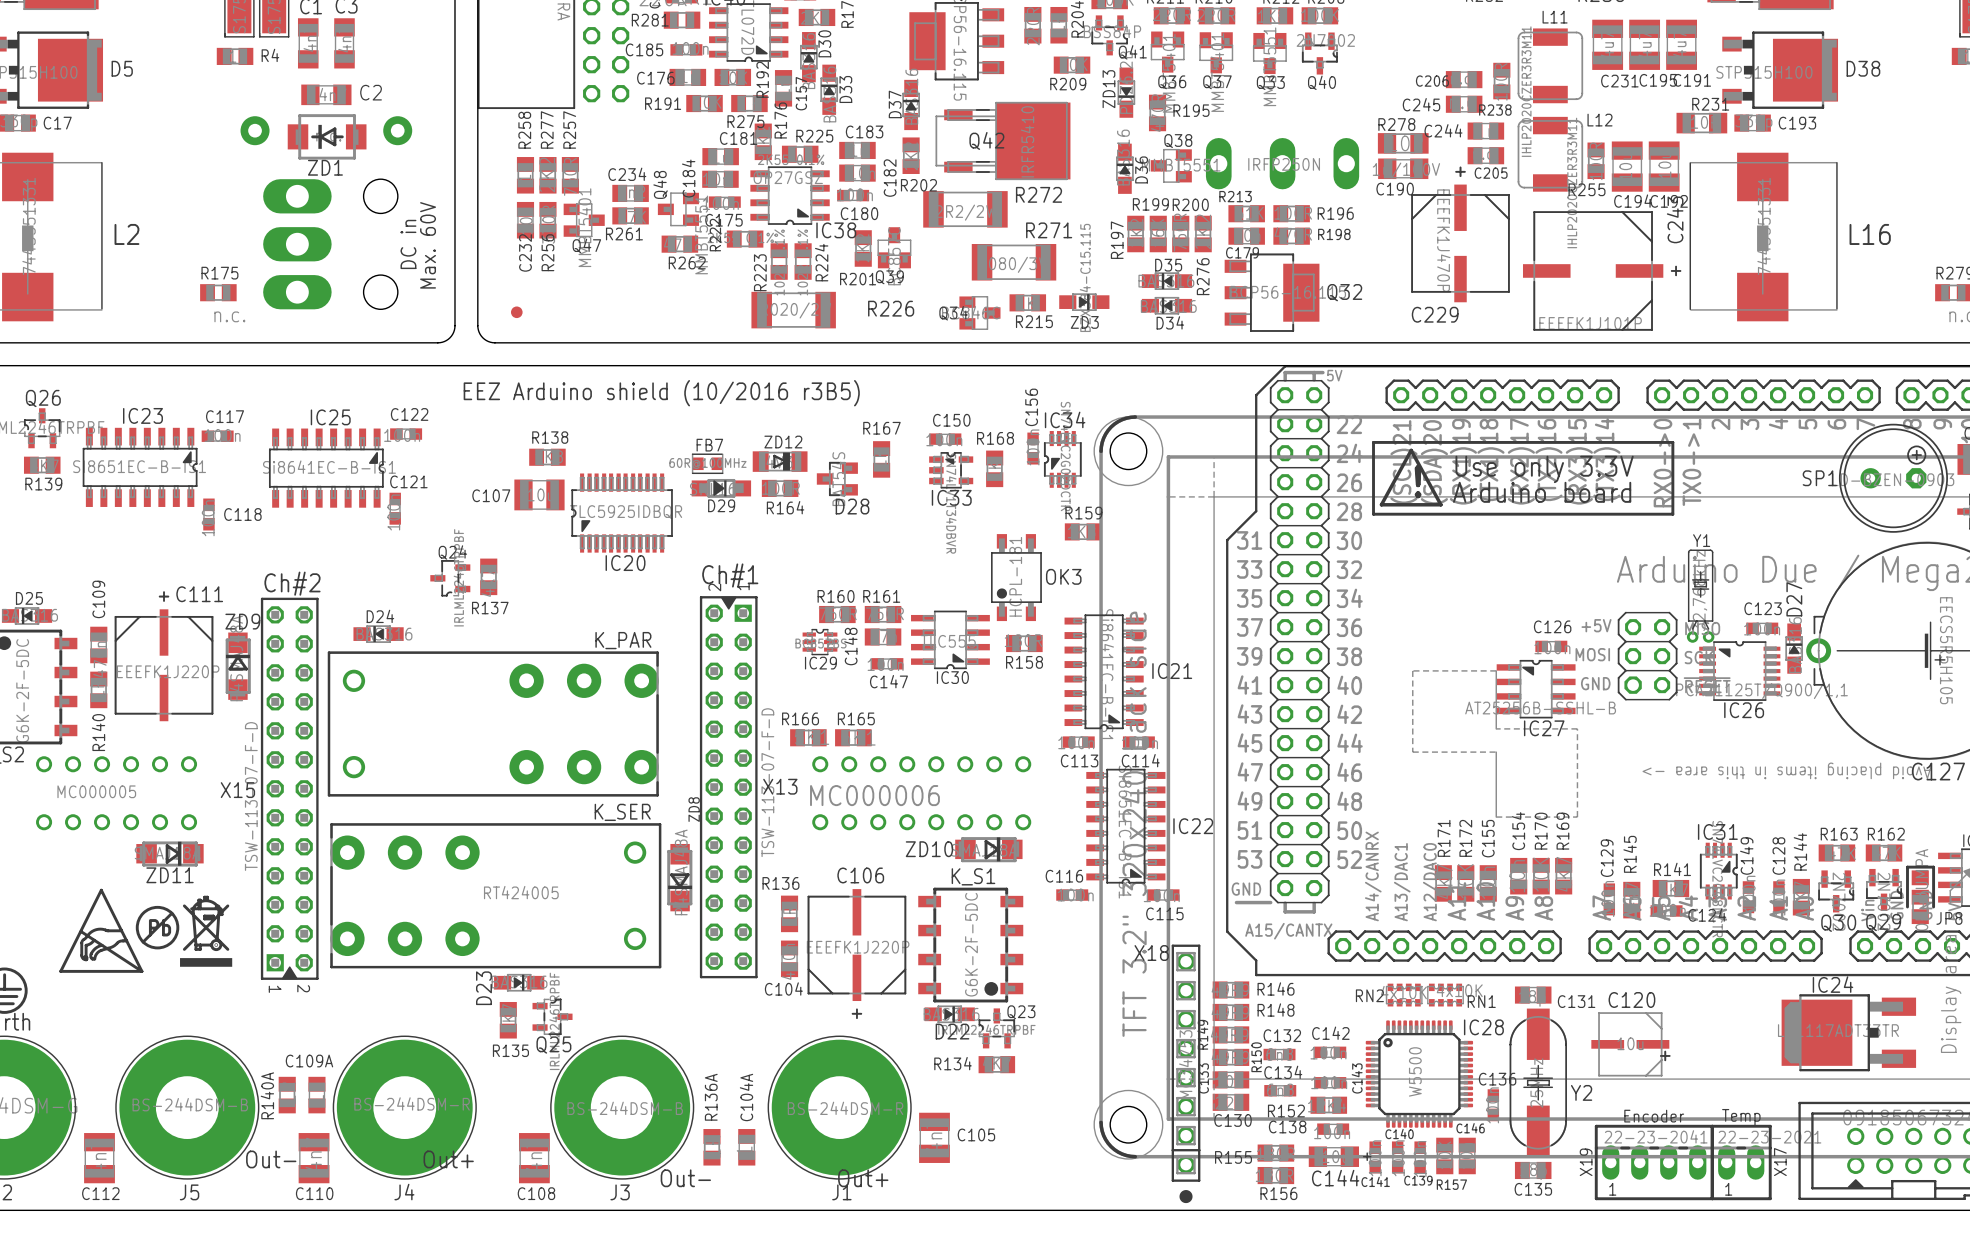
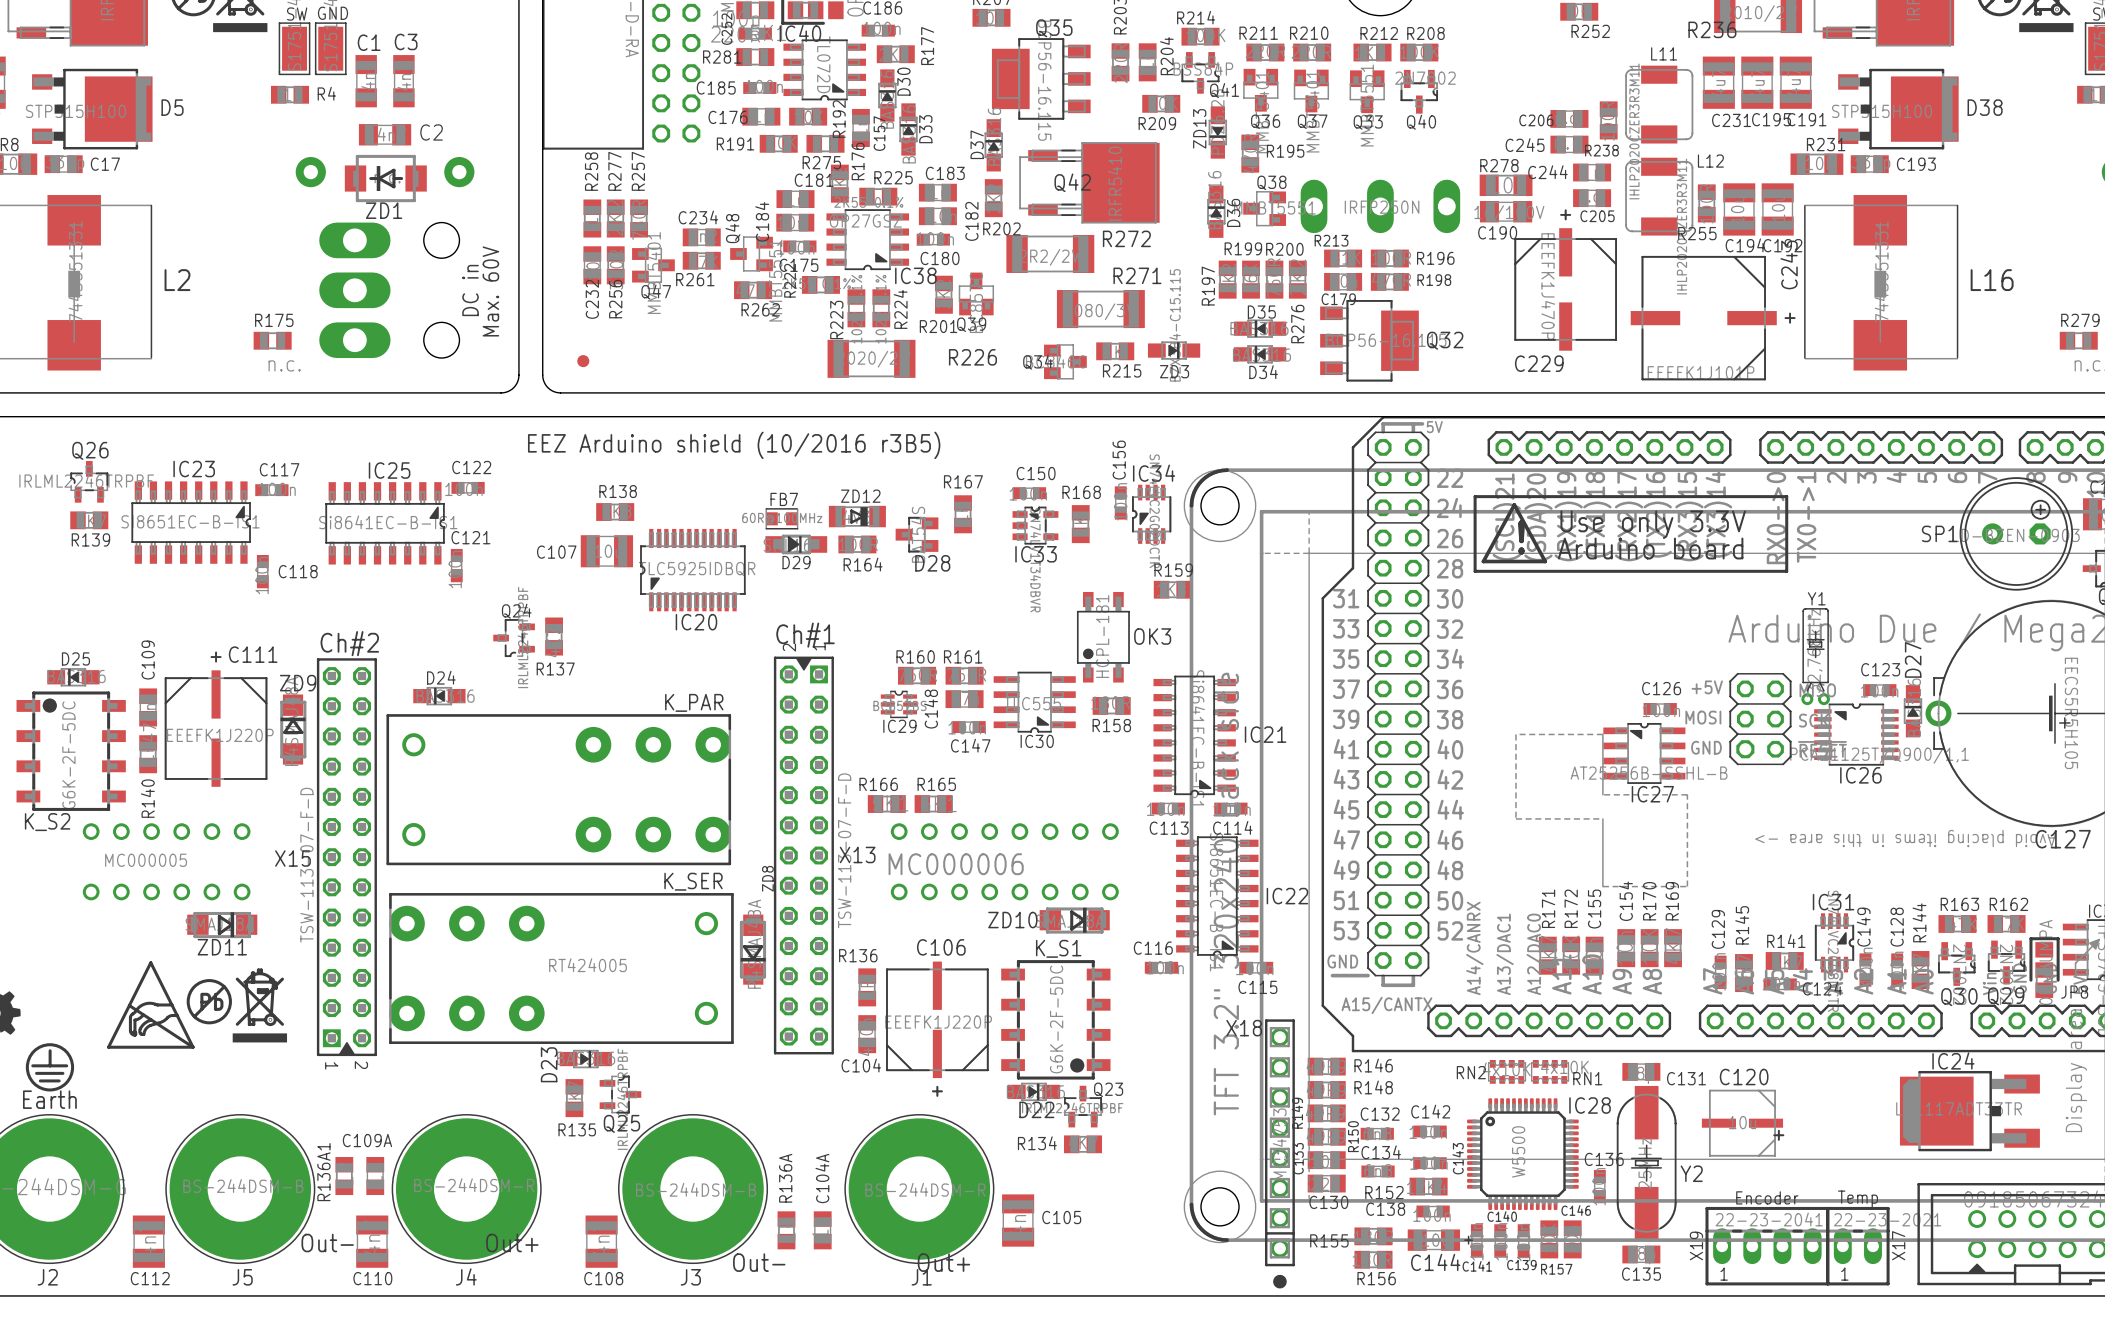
R140A name: R140A (267, 1095) -> R136A1 (323, 1172)

